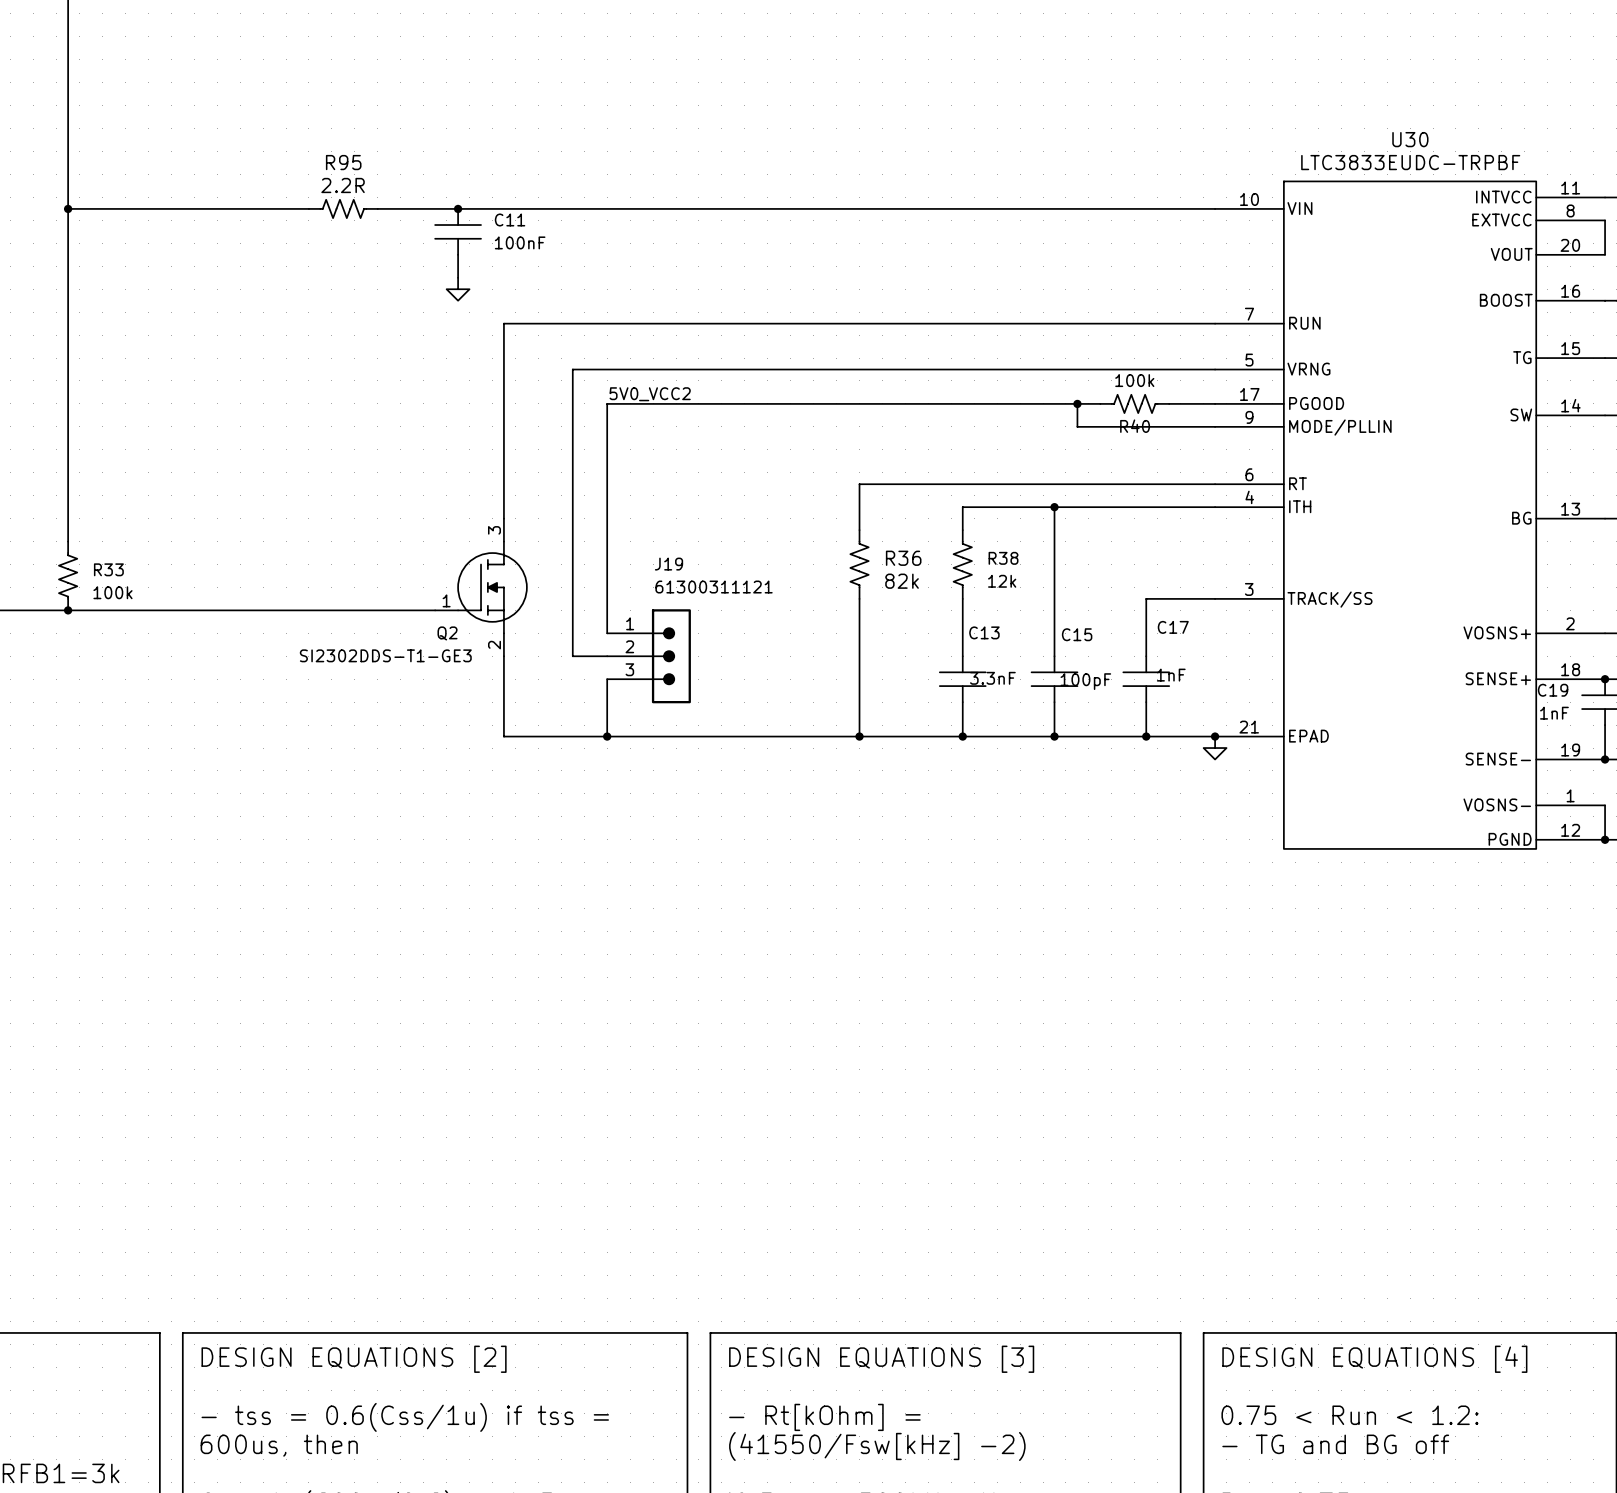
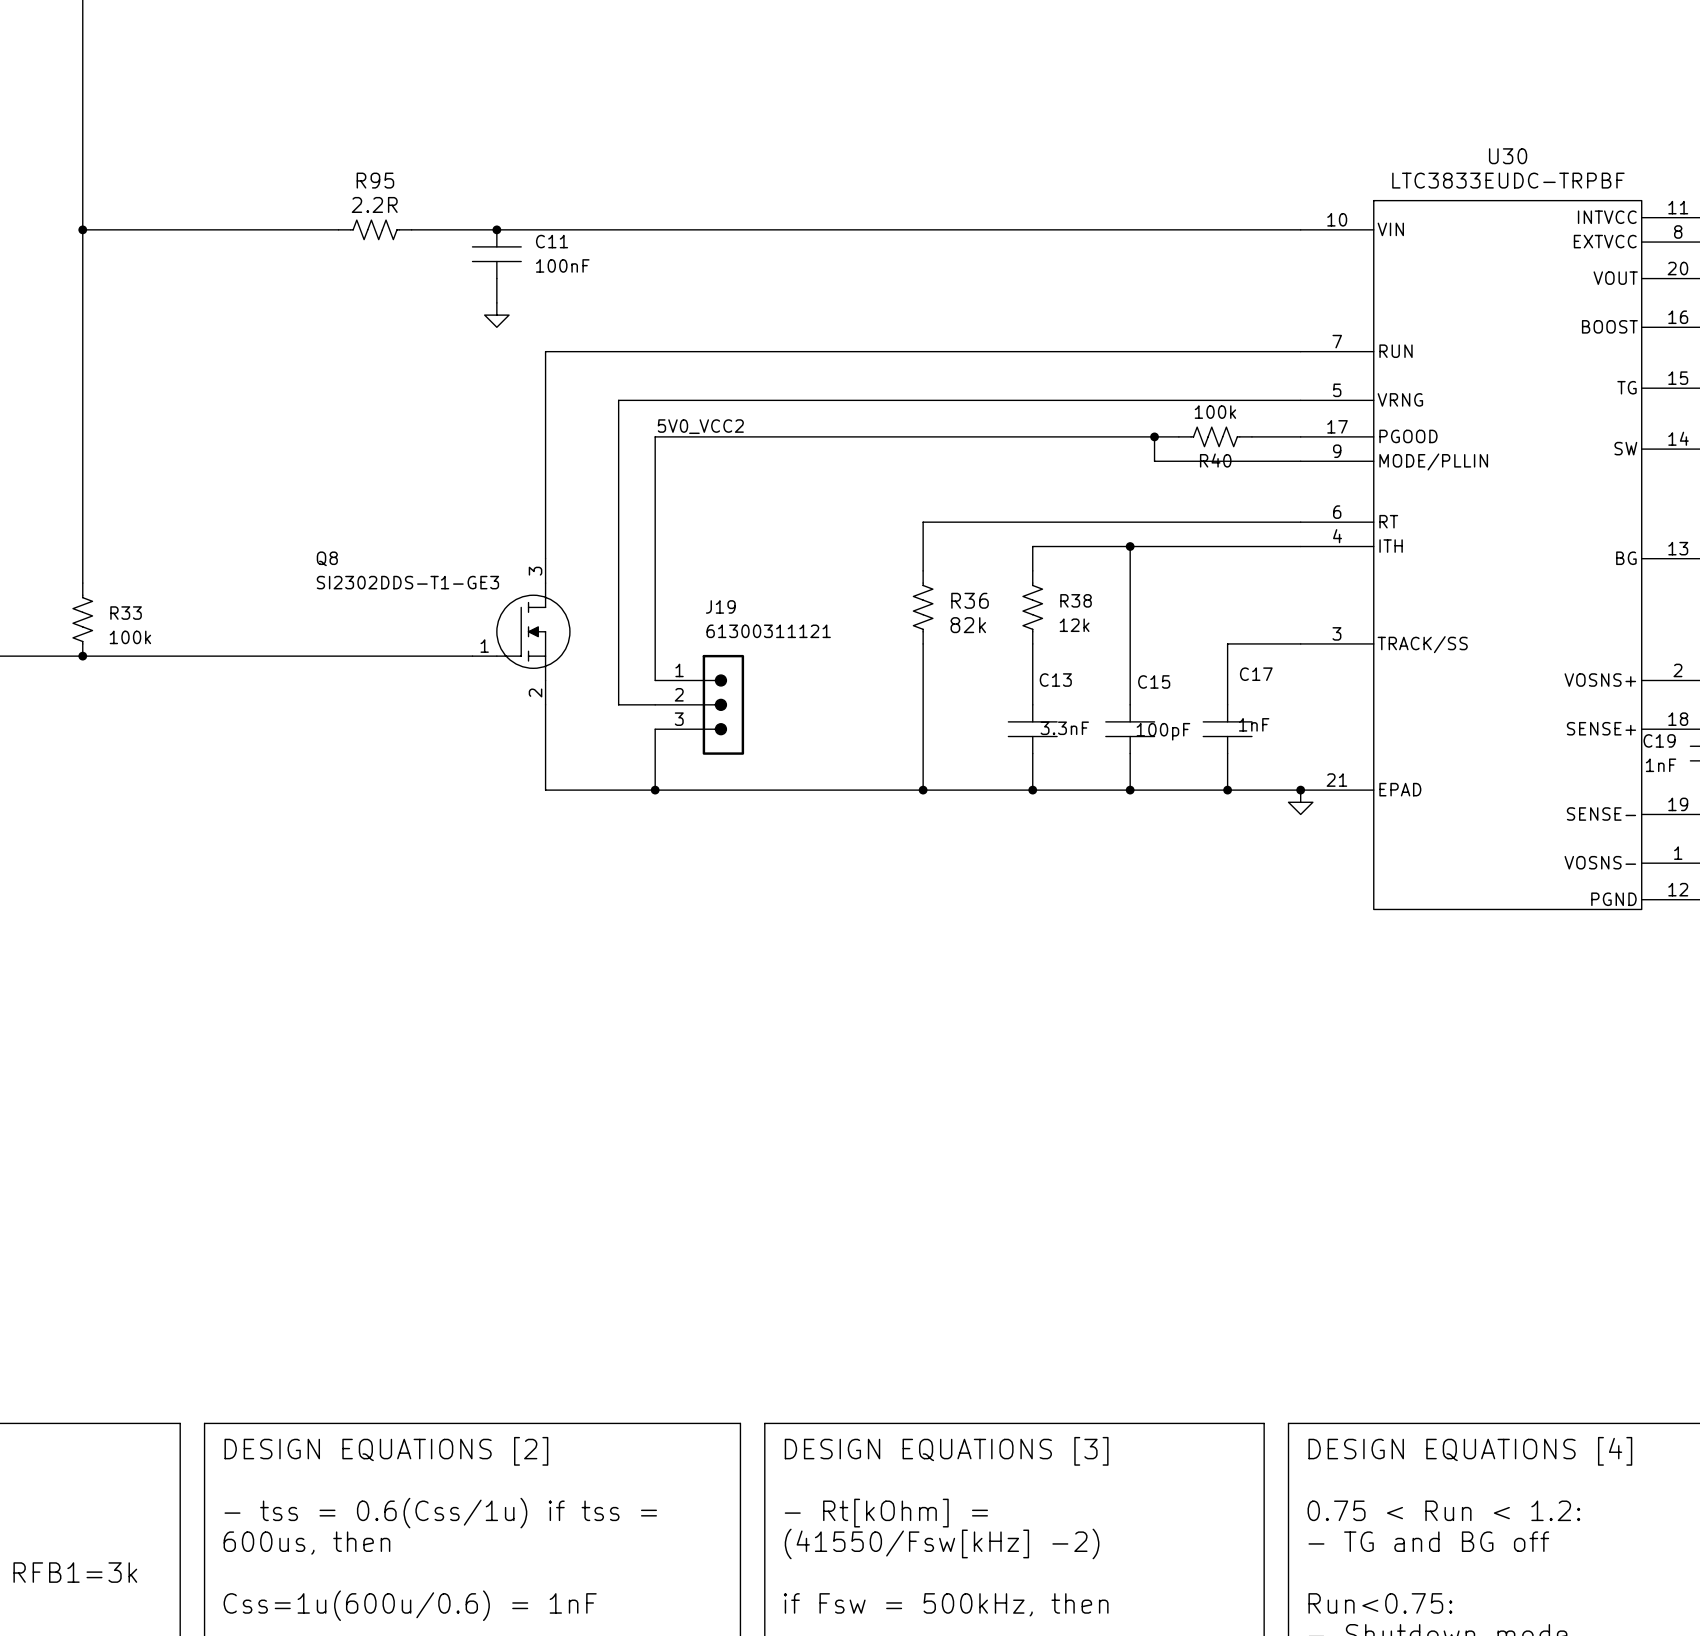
Q2 name: Q2 (447, 633) -> Q8 (327, 558)
Q2 value position: SI2302DDS-T1-GE3 (385, 655) -> SI2302DDS-T1-GE3 (407, 582)

